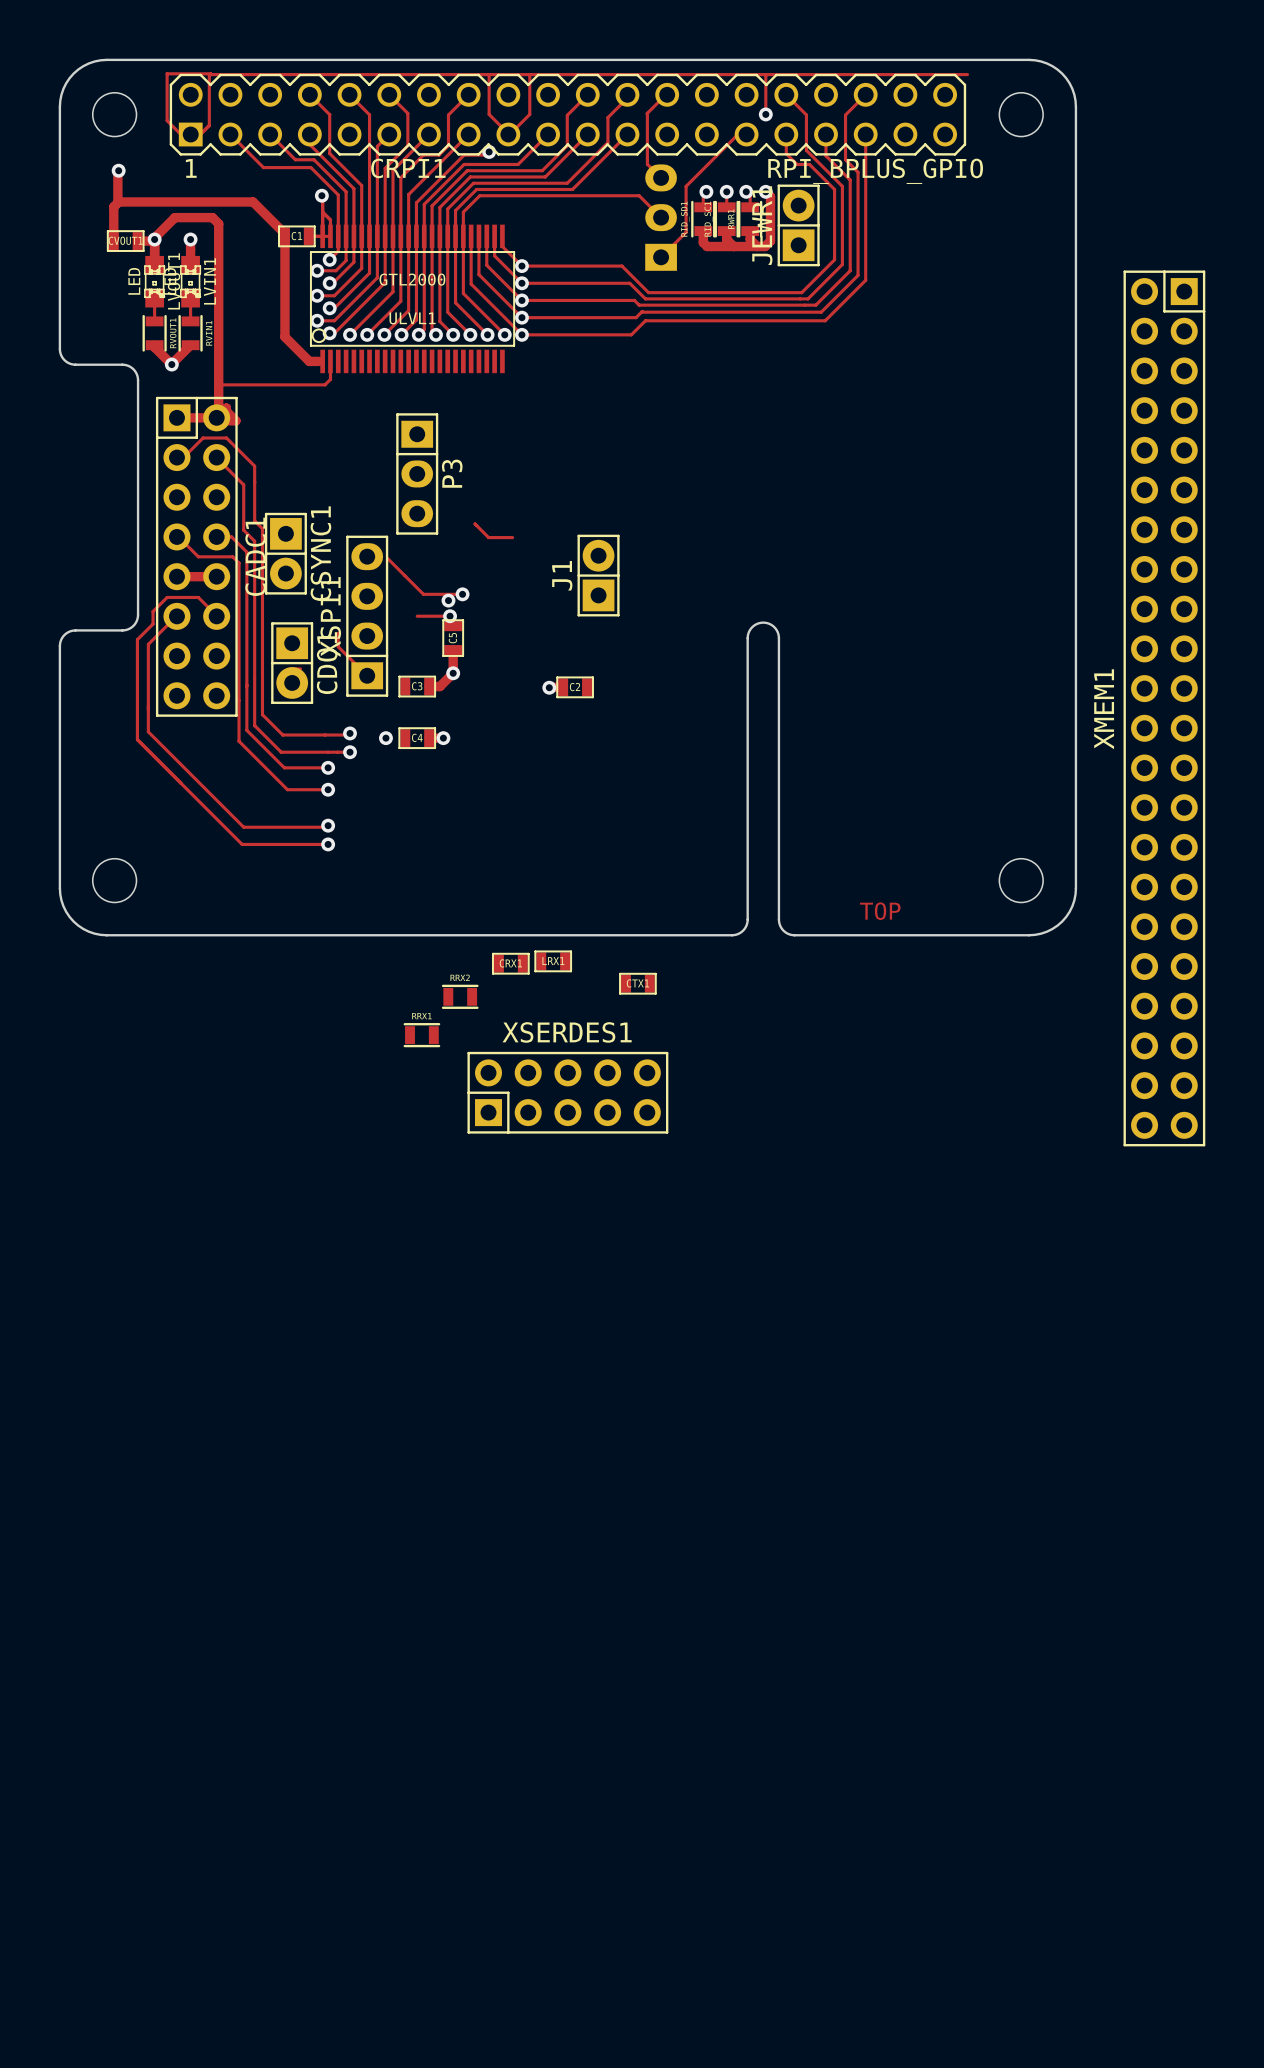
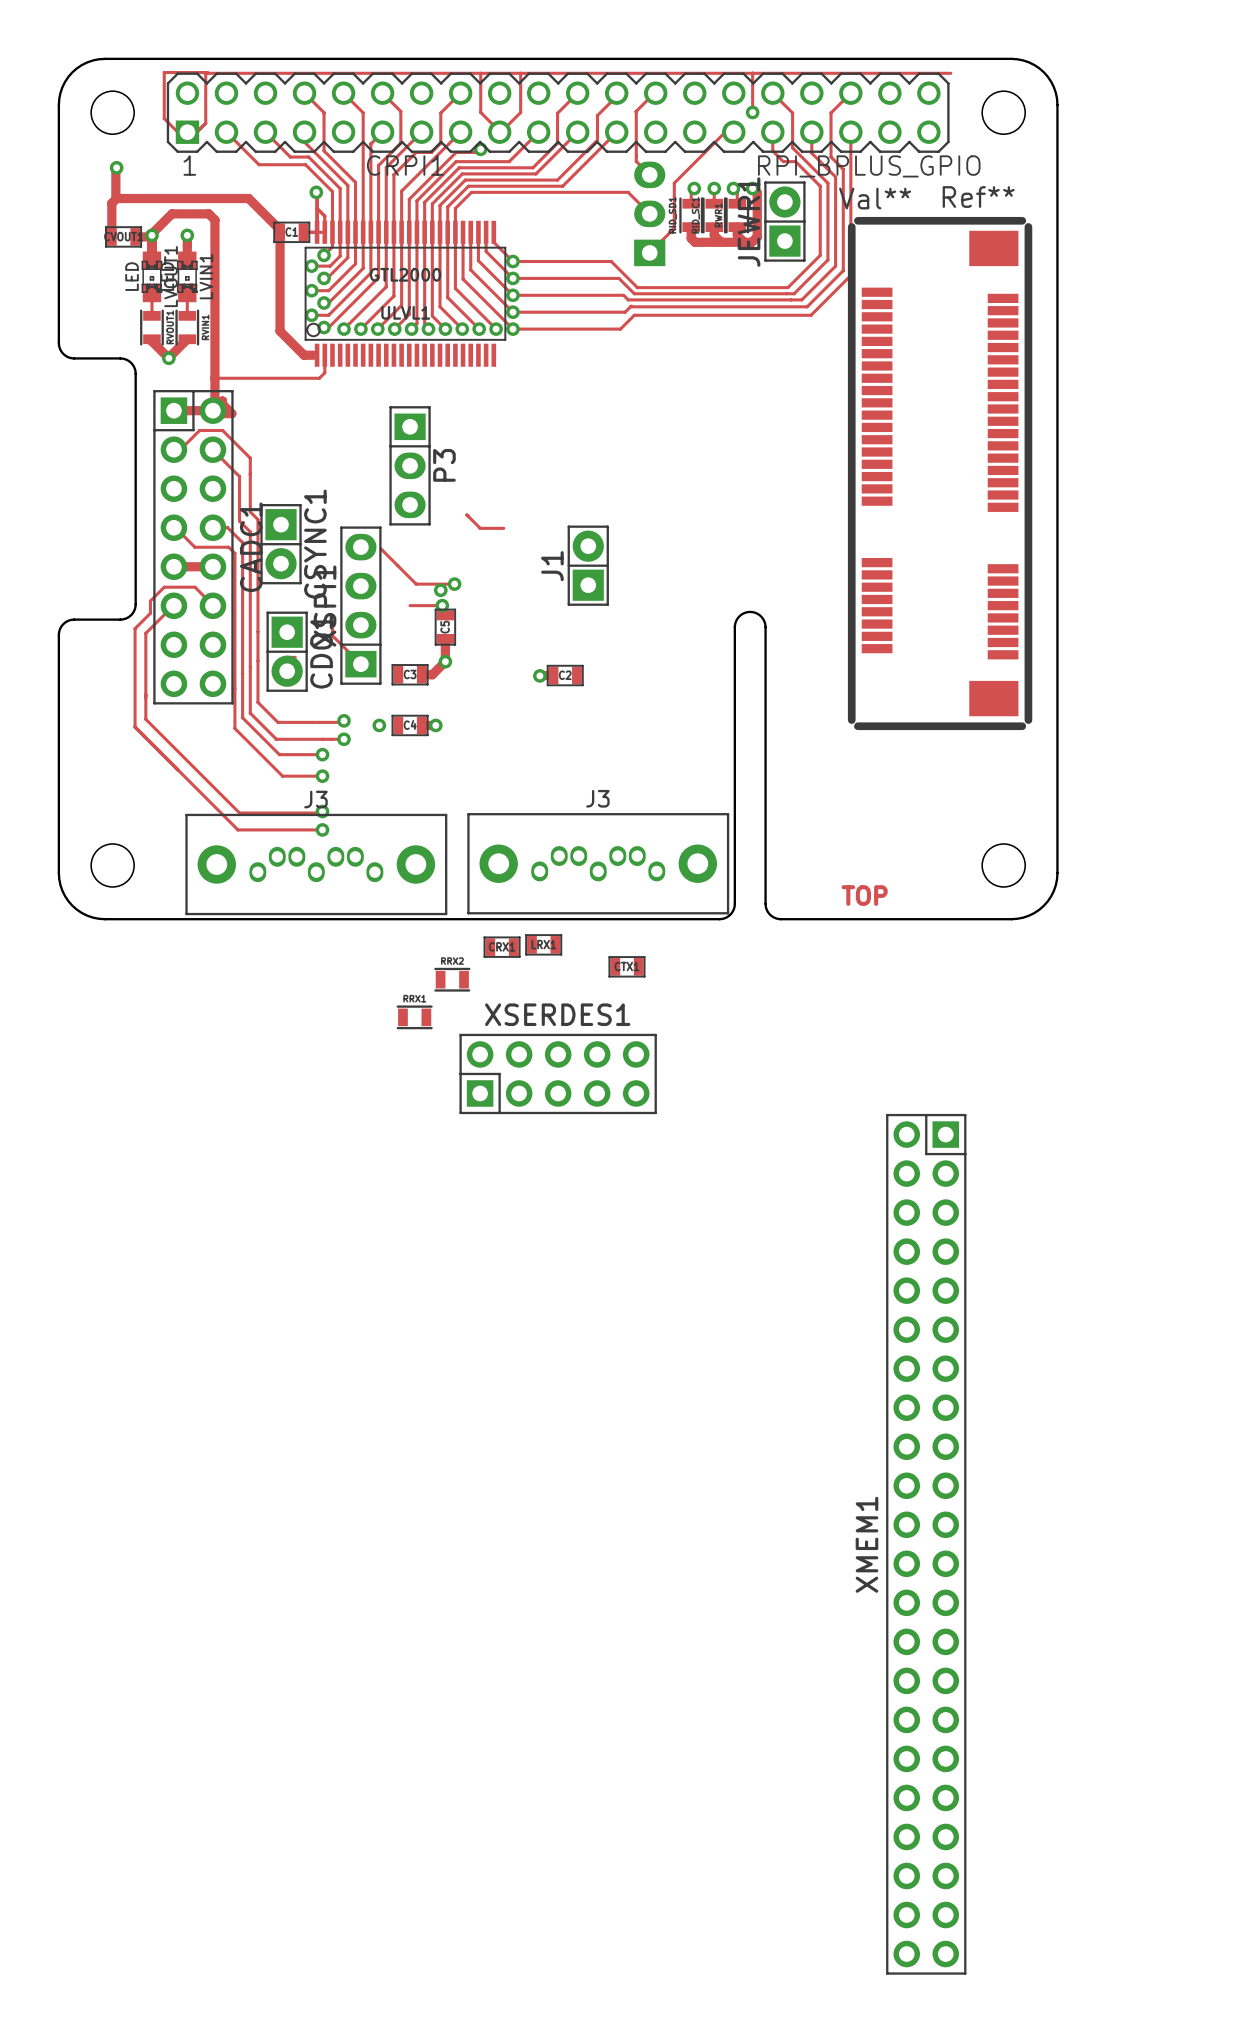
Ref**: none -> Val** (940, 473)
XMEM1 position: (1164, 708) -> (926, 1544)
J3: none -> (598, 863)
J3: none -> (316, 864)

